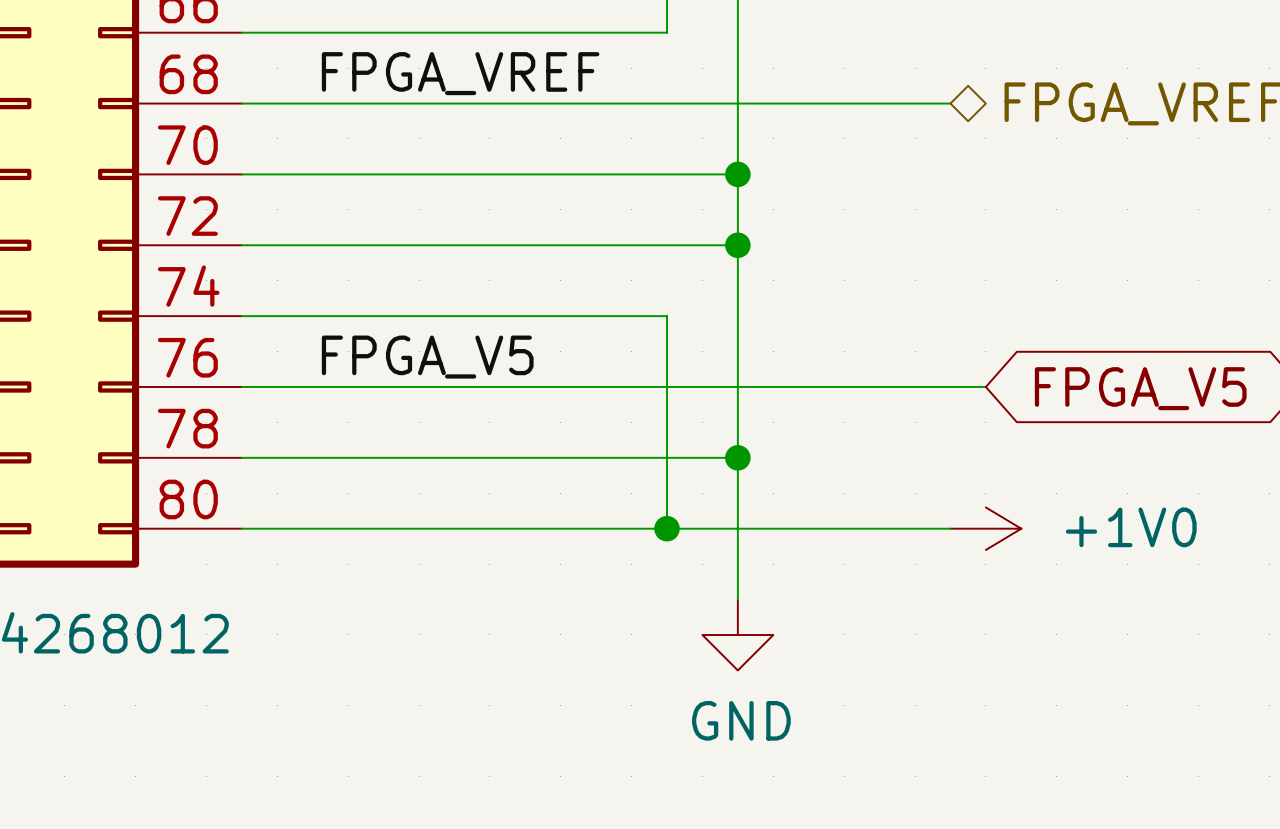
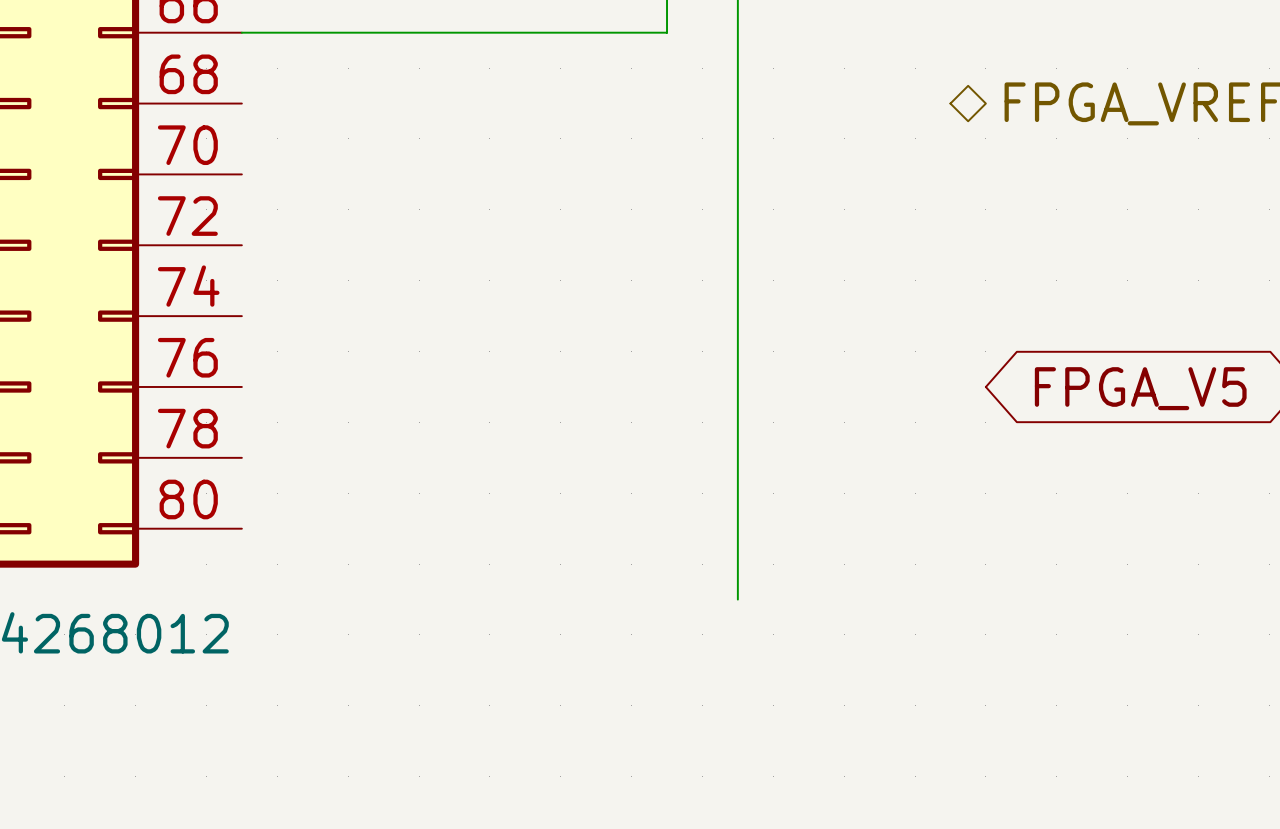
label: FPGA_VREF (460, 73) -> none
wire: (241, 103) (950, 103) -> none
wire: (241, 174) (737, 174) -> none
junction: (737, 174) -> none
wire: (241, 245) (737, 245) -> none
junction: (737, 245) -> none
wire: (241, 316) (667, 316) (667, 528) -> none
label: FPGA_V5 (427, 357) -> none
wire: (241, 386) (985, 386) -> none
wire: (241, 457) (737, 457) -> none
junction: (737, 457) -> none
wire: (241, 528) (950, 528) -> none
junction: (667, 528) -> none
power symbol: +1V0 (985, 528) -> none
power symbol: GND (737, 634) -> none

